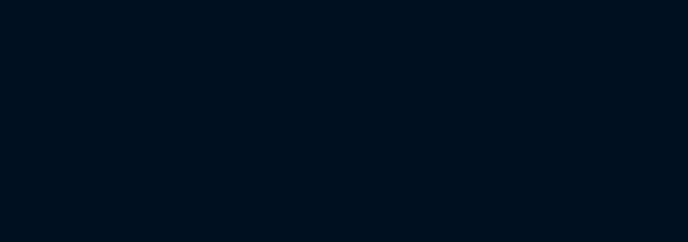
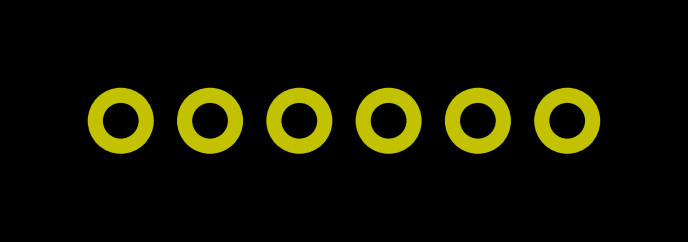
part: none -> (343, 120)

